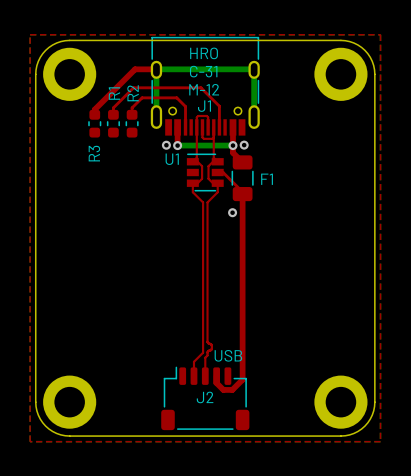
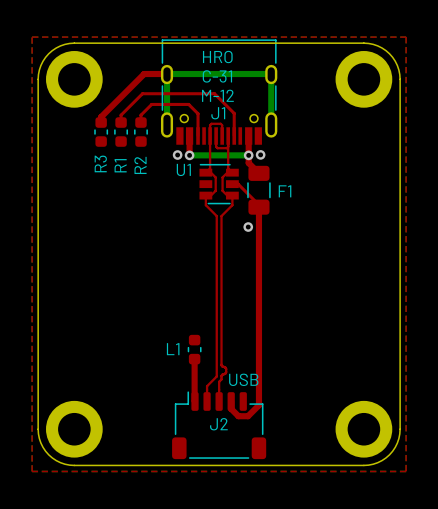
R1 name position: R1 (114, 93) -> R1 (120, 165)
R2 name position: R2 (133, 93) -> R2 (140, 165)
L1: none -> (194, 349)
top track: none -> (194, 359) (195, 401)

